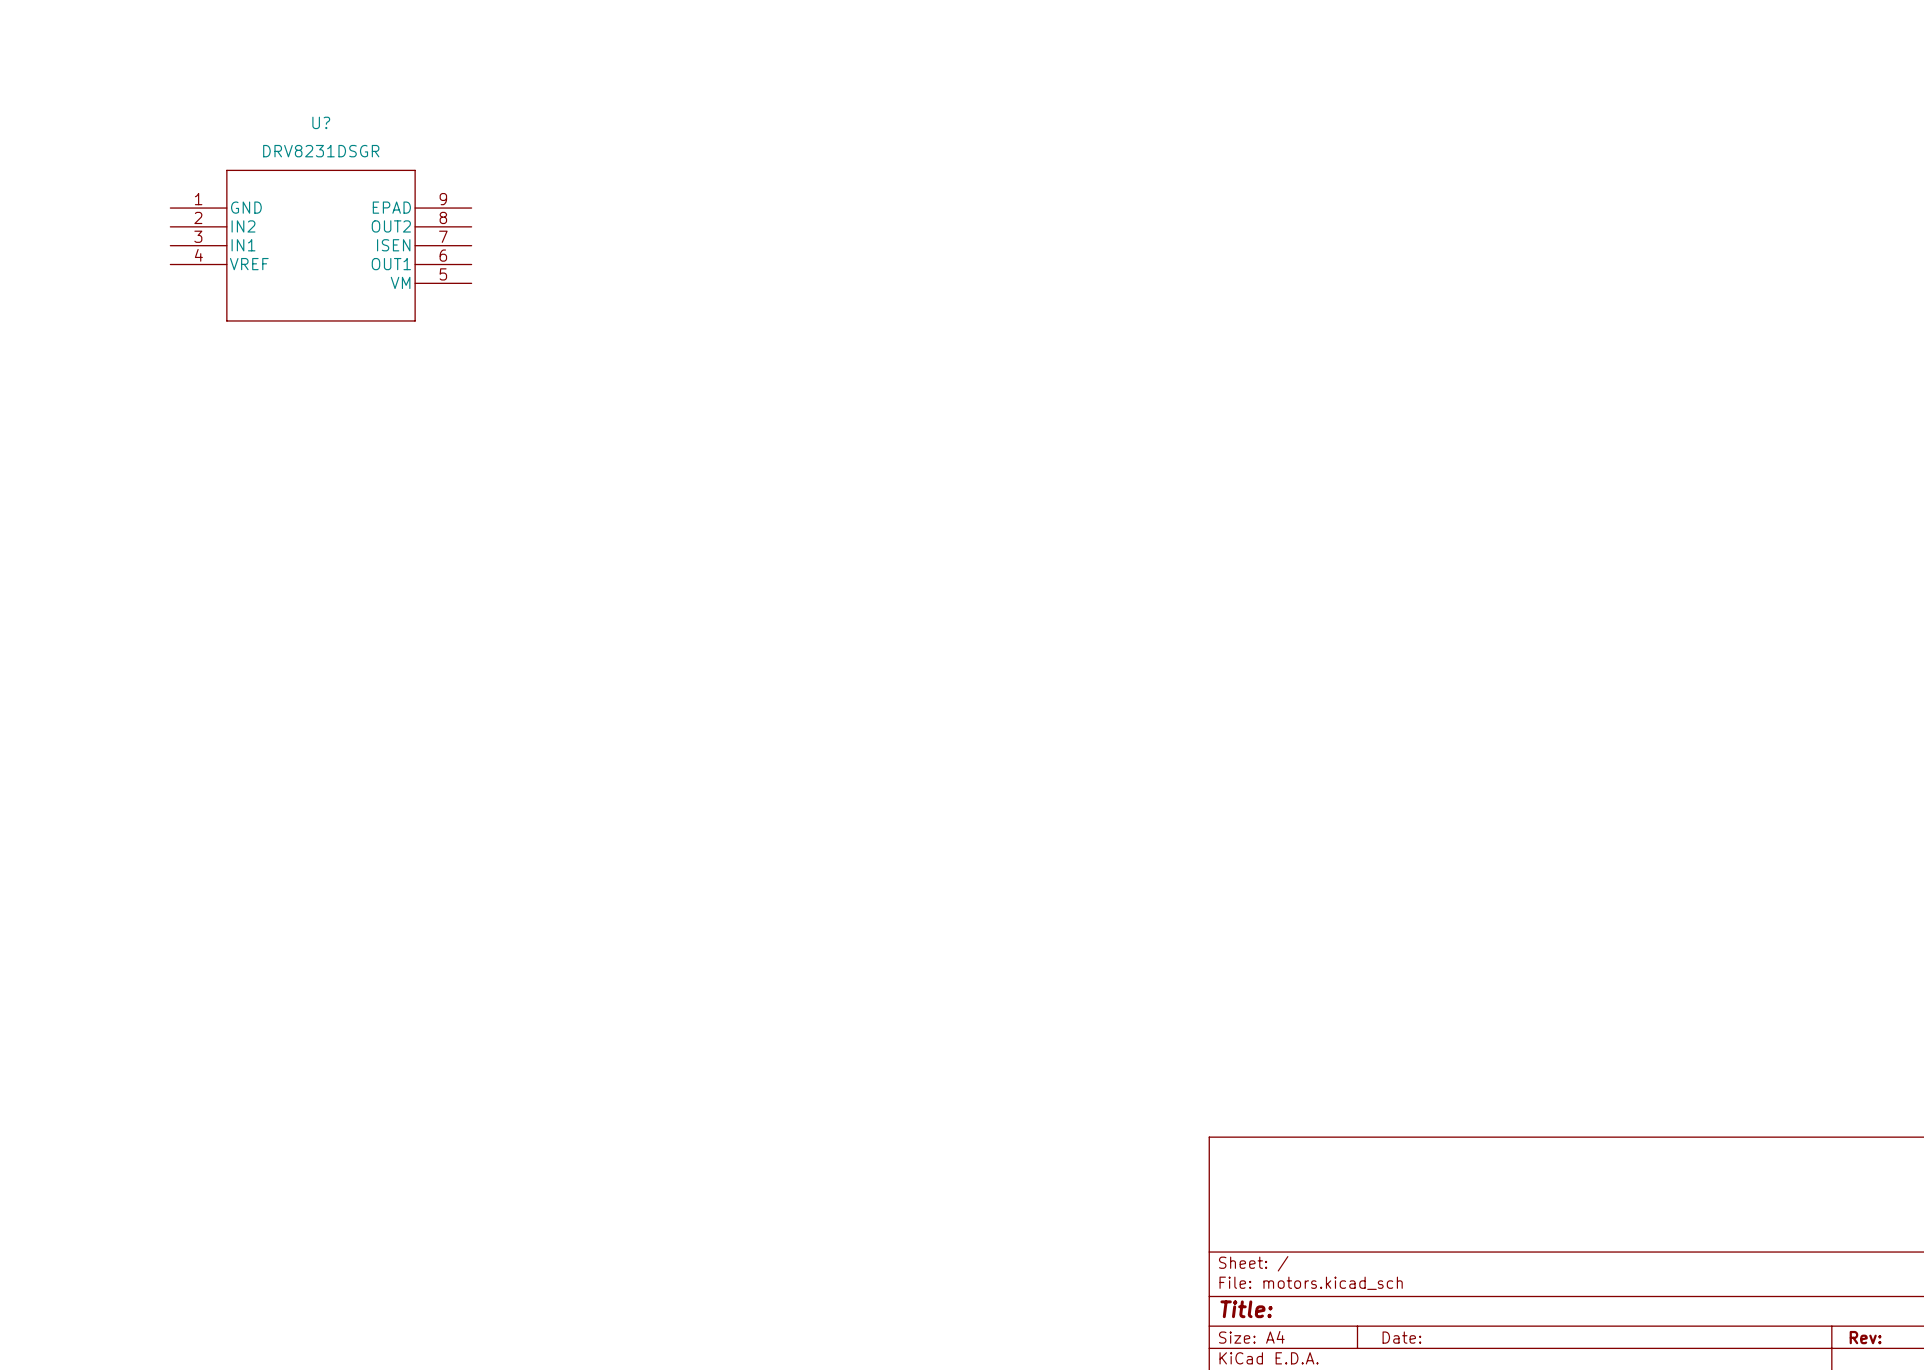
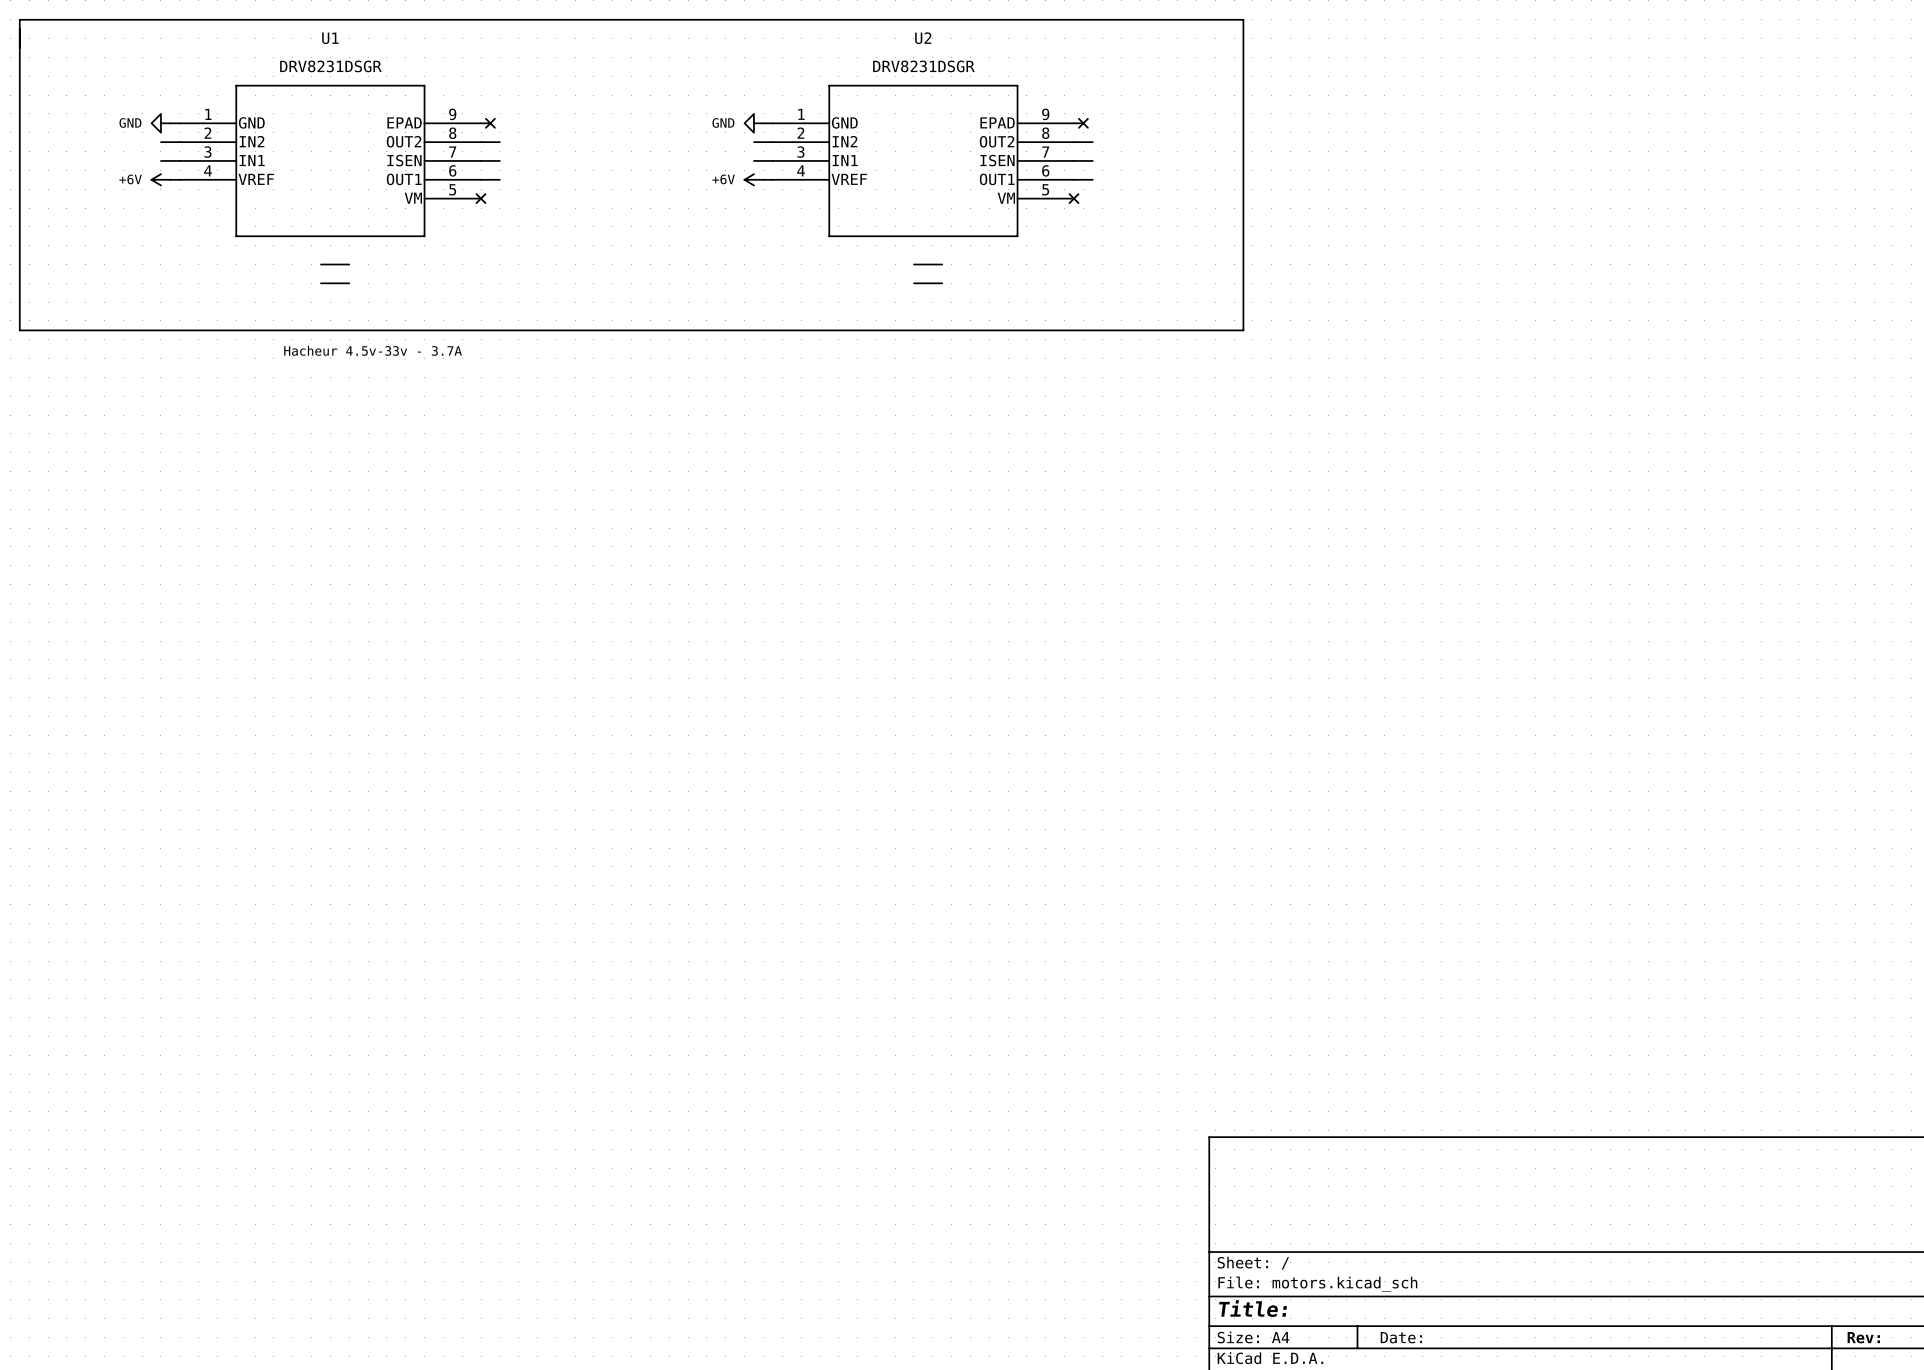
line: none -> (19, 19) (19, 330) (1243, 330) (1243, 19) (19, 19)
power symbol: none -> GND (160, 123)
wire: none -> (170, 123) (179, 123)
wire: none -> (481, 123) (490, 123)
no-connect mark: none -> (490, 123)
power symbol: none -> GND (753, 123)
wire: none -> (763, 123) (772, 123)
wire: none -> (1074, 123) (1083, 123)
no-connect mark: none -> (1083, 123)
wire: none -> (160, 142) (179, 142)
wire: none -> (481, 142) (499, 142)
wire: none -> (753, 142) (772, 142)
wire: none -> (1074, 142) (1092, 142)
wire: none -> (160, 160) (179, 160)
U1: none -> DRV8231DSGR (330, 160)
wire: none -> (481, 160) (499, 160)
wire: none -> (753, 160) (772, 160)
U2: none -> DRV8231DSGR (923, 160)
wire: none -> (1074, 160) (1092, 160)
power symbol: none -> +6V (160, 179)
wire: none -> (170, 179) (179, 179)
wire: none -> (481, 179) (499, 179)
power symbol: none -> +6V (753, 179)
wire: none -> (763, 179) (772, 179)
wire: none -> (1074, 179) (1092, 179)
no-connect mark: none -> (481, 198)
no-connect mark: none -> (1074, 198)
U?: DRV8231DSGR (320, 245) -> none
wire: none -> (320, 264) (349, 264)
wire: none -> (913, 264) (942, 264)
wire: none -> (320, 283) (349, 283)
wire: none -> (913, 283) (942, 283)
text: none -> Hacheur 4.5v-33v - 3.7A (373, 350)

